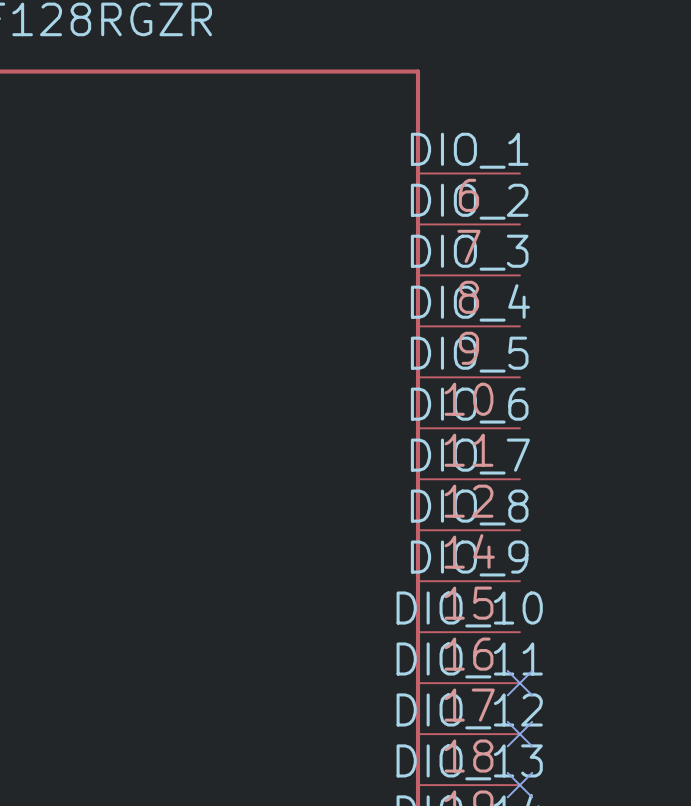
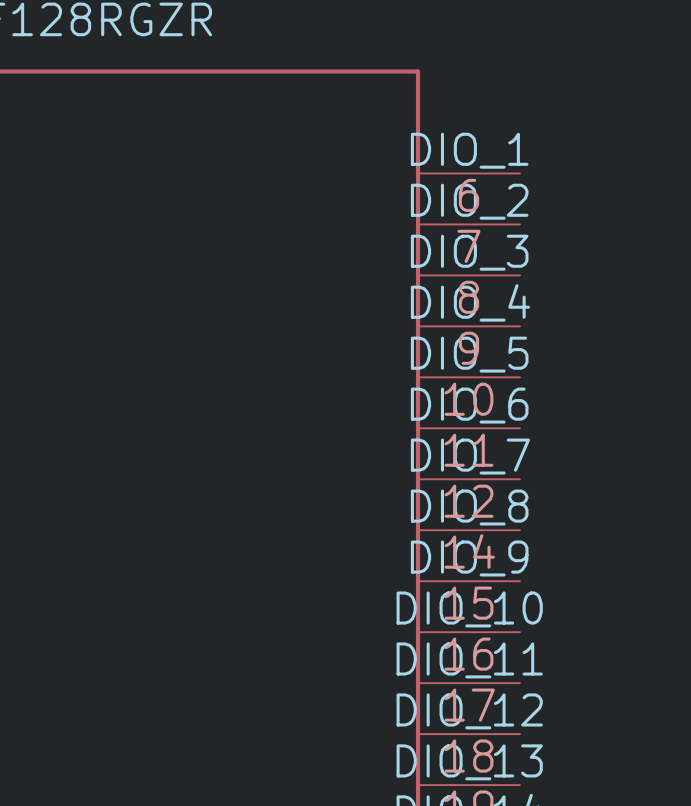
no-connect mark: (519, 683) -> none
no-connect mark: (519, 734) -> none
no-connect mark: (519, 785) -> none

